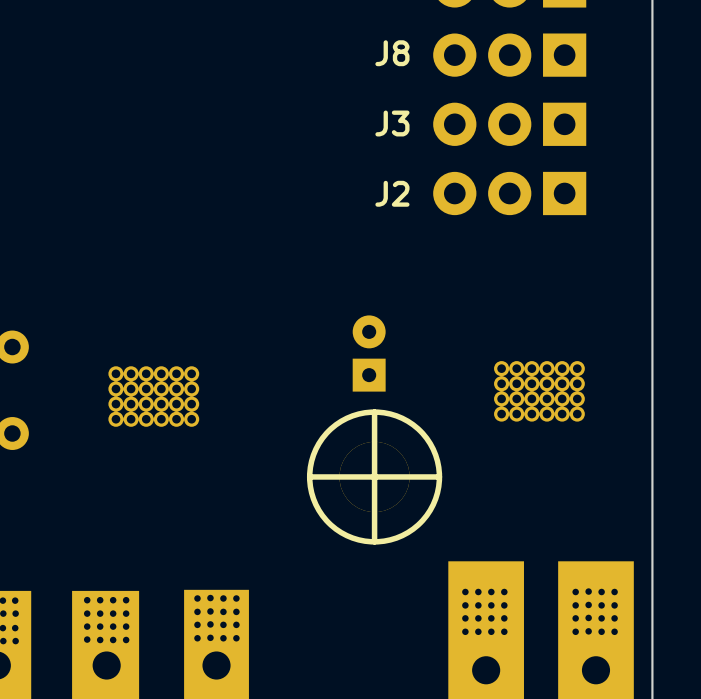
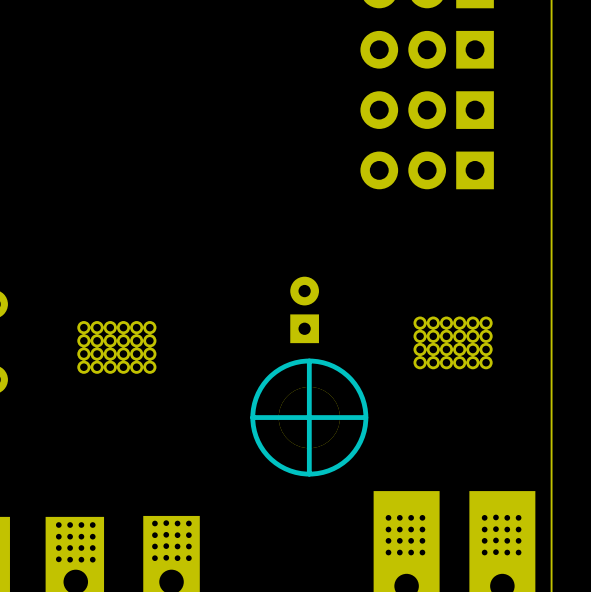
J8 name: J8 (392, 53) -> none
J3 name: J3 (392, 123) -> none
J2 name: J2 (392, 193) -> none

